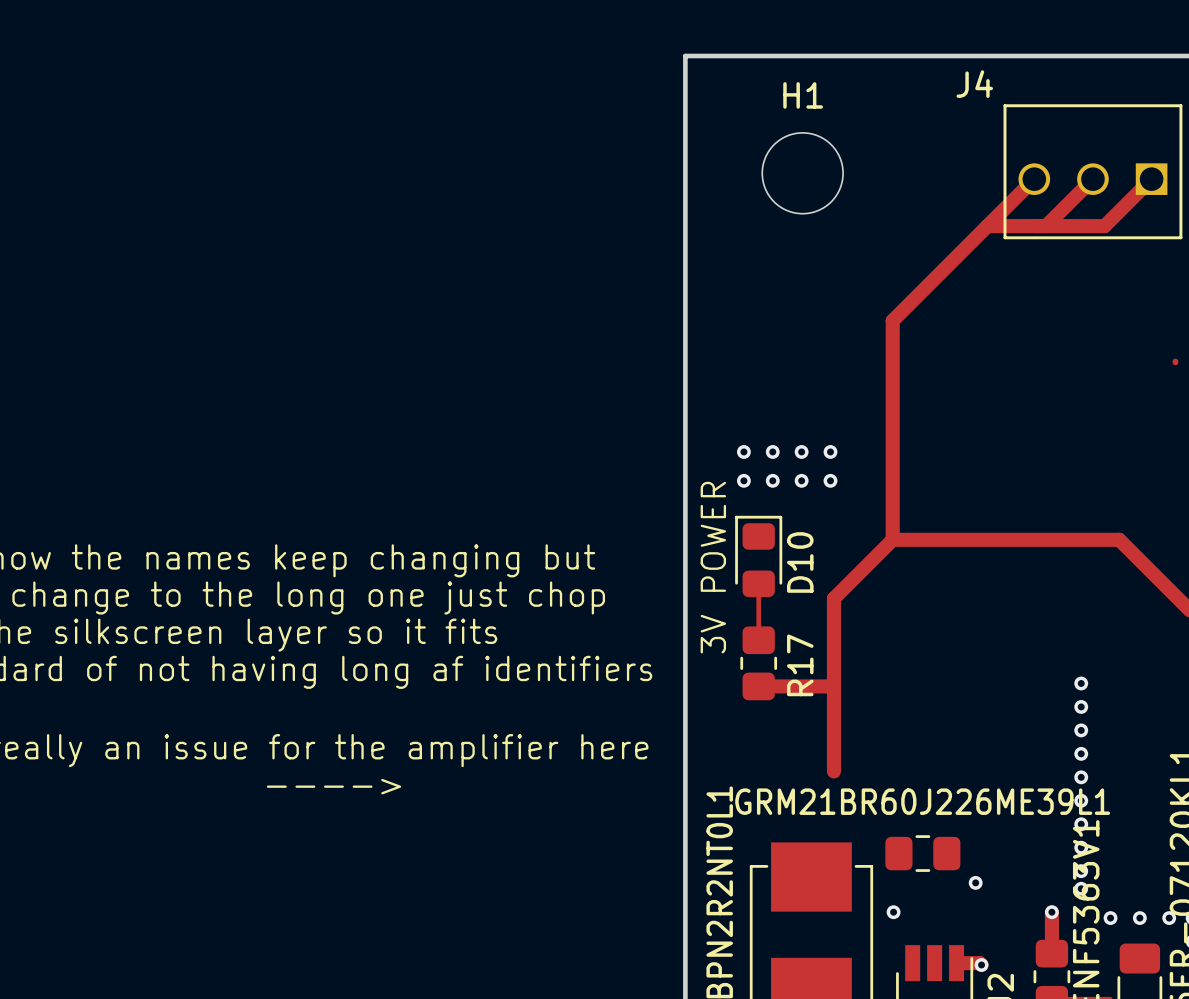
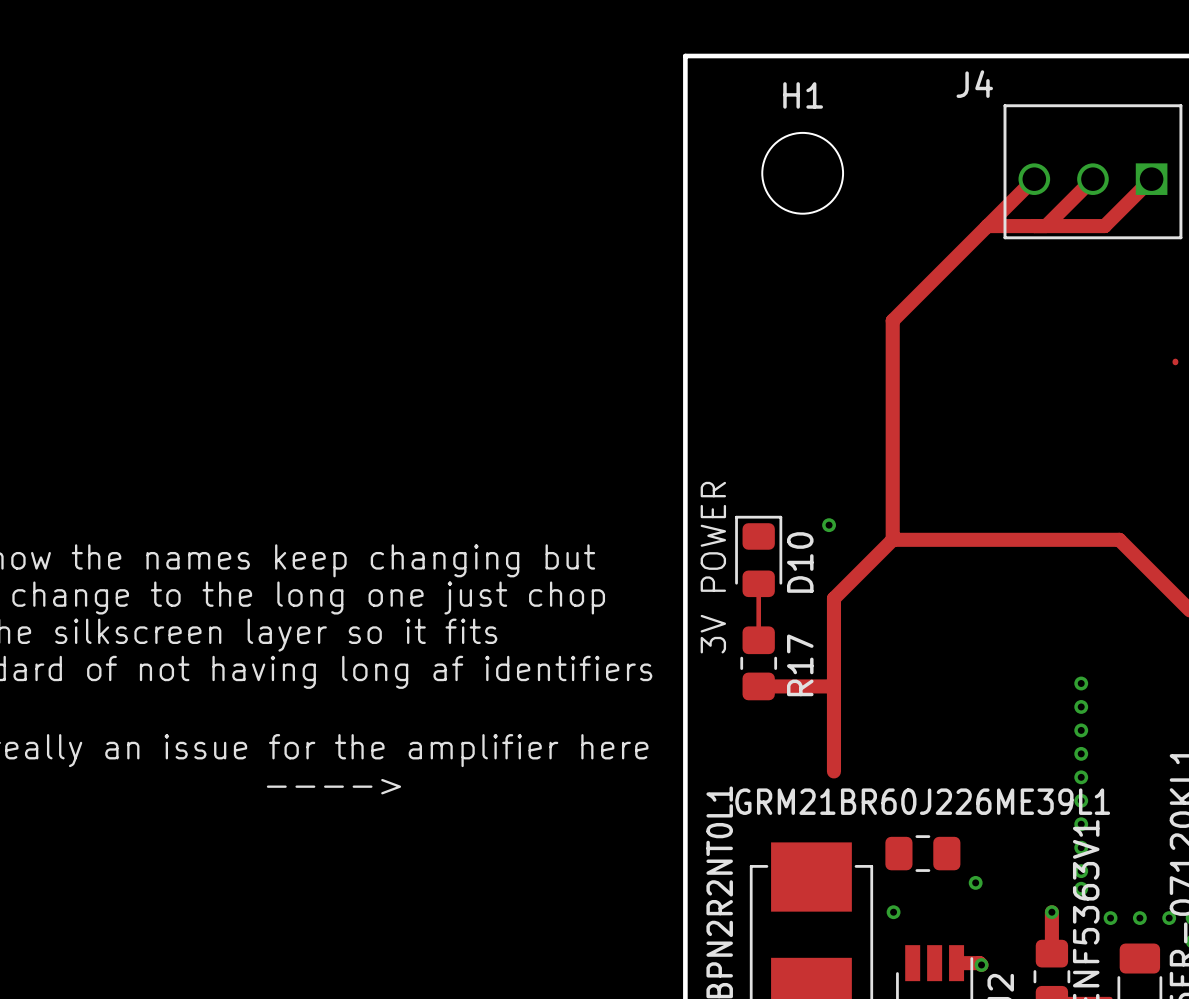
via: (743, 451) -> none
via: (772, 451) -> none
via: (801, 451) -> none
via: (830, 451) -> none
via: (743, 480) -> none
via: (772, 480) -> none
via: (801, 480) -> none
via: (830, 480) -> none
via: none -> (829, 525)

